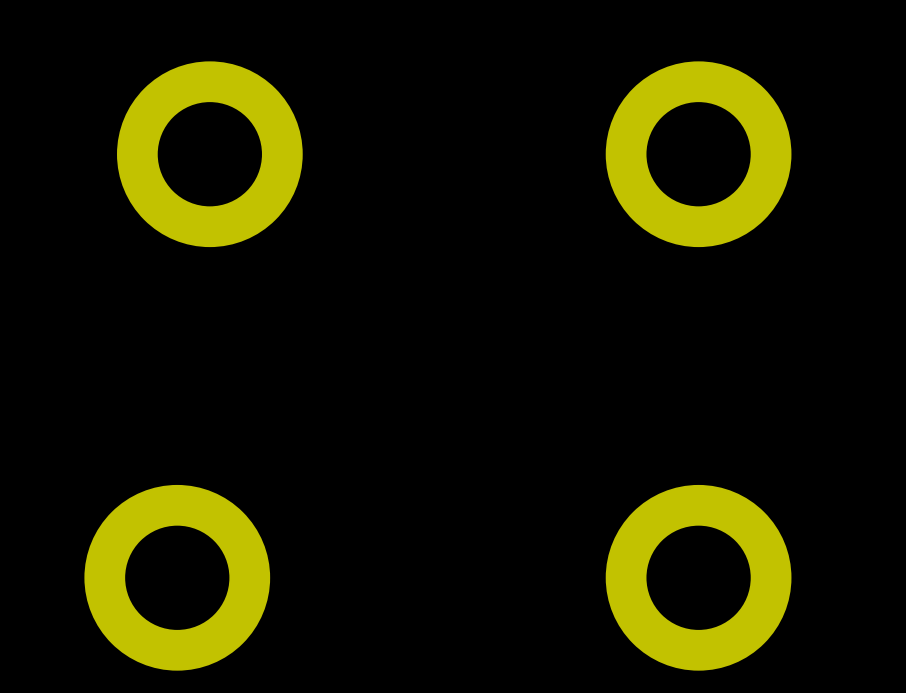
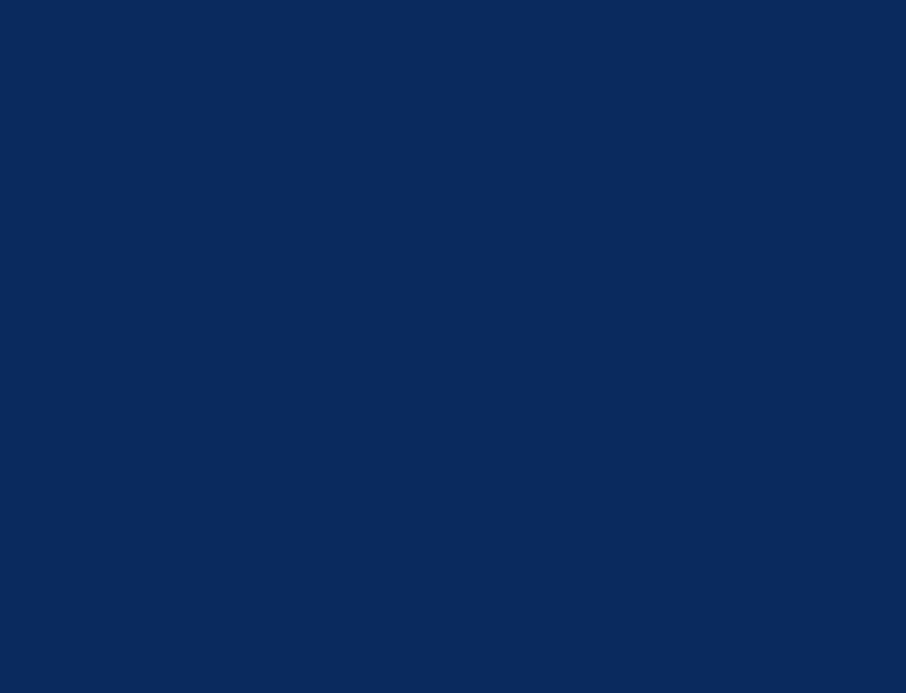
part: (209, 154) -> none
part: (698, 154) -> none
part: (177, 577) -> none
part: (698, 577) -> none

